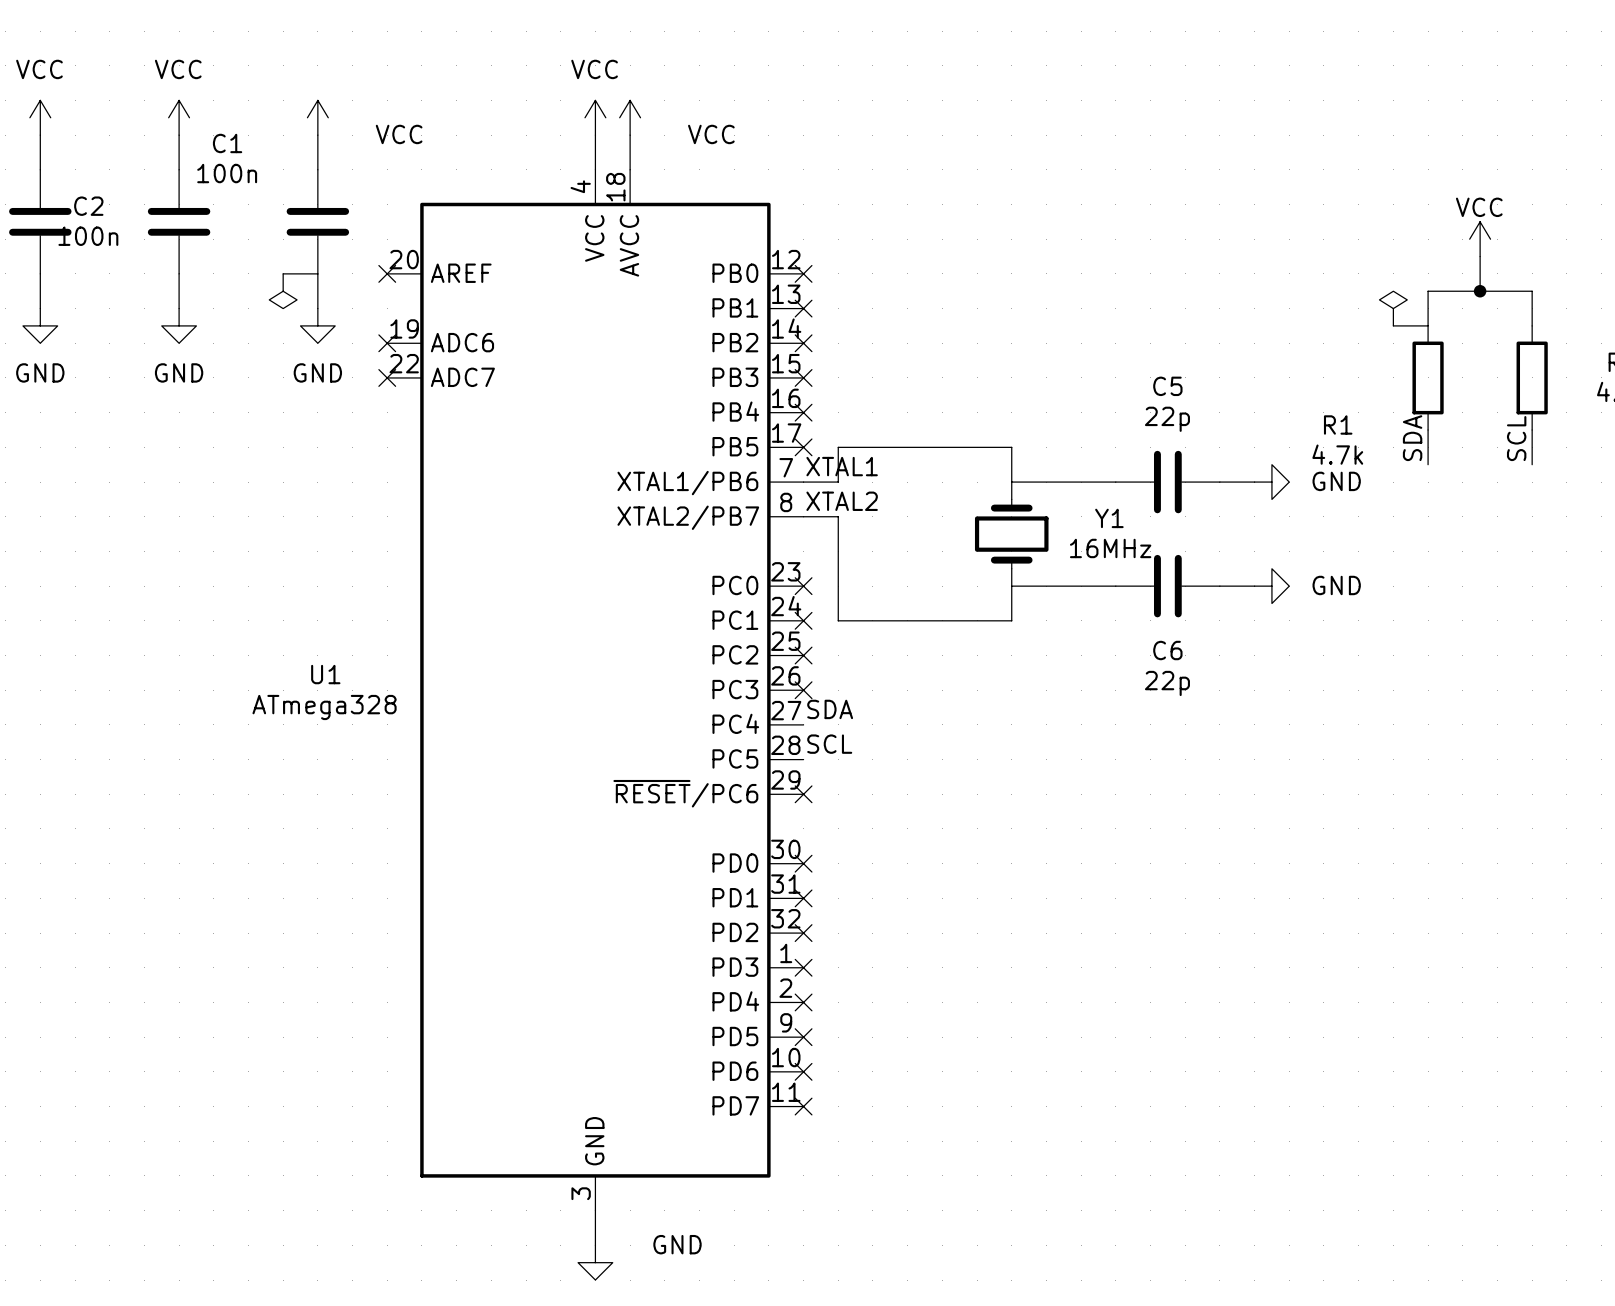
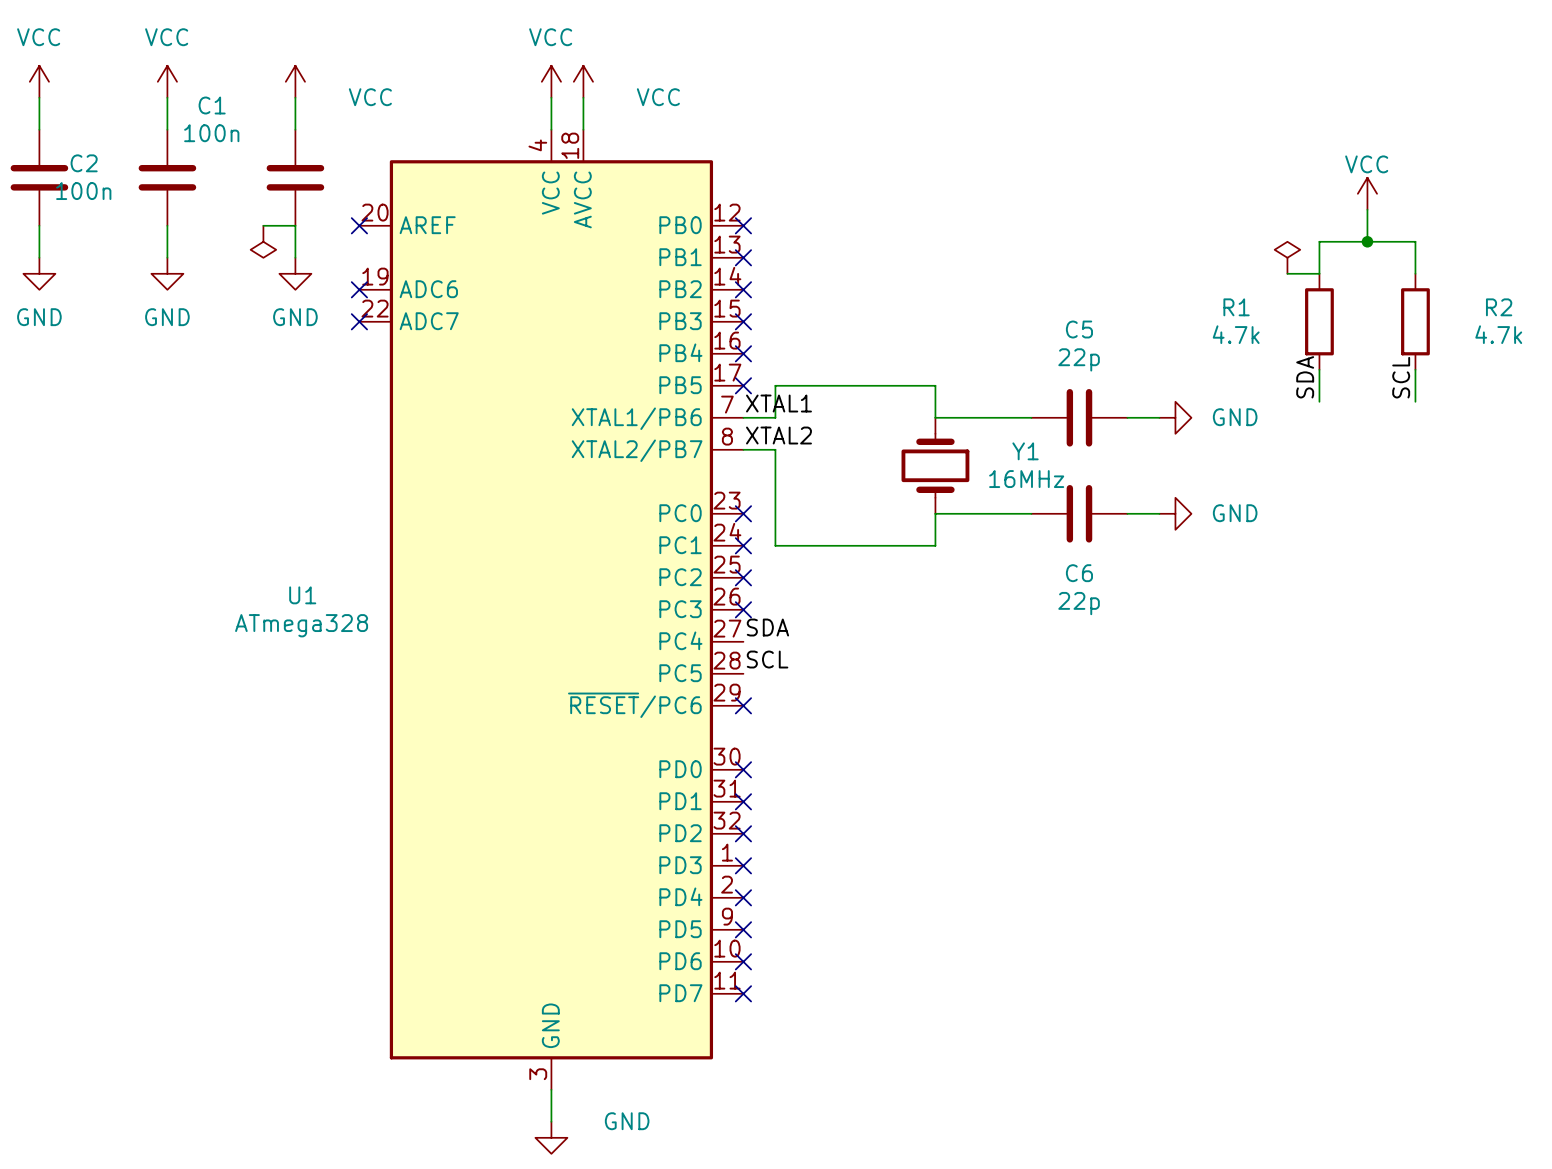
R1 name position: R1 (1338, 424) -> R1 (1236, 307)
R1 value position: 4.7k (1337, 454) -> 4.7k (1236, 334)

